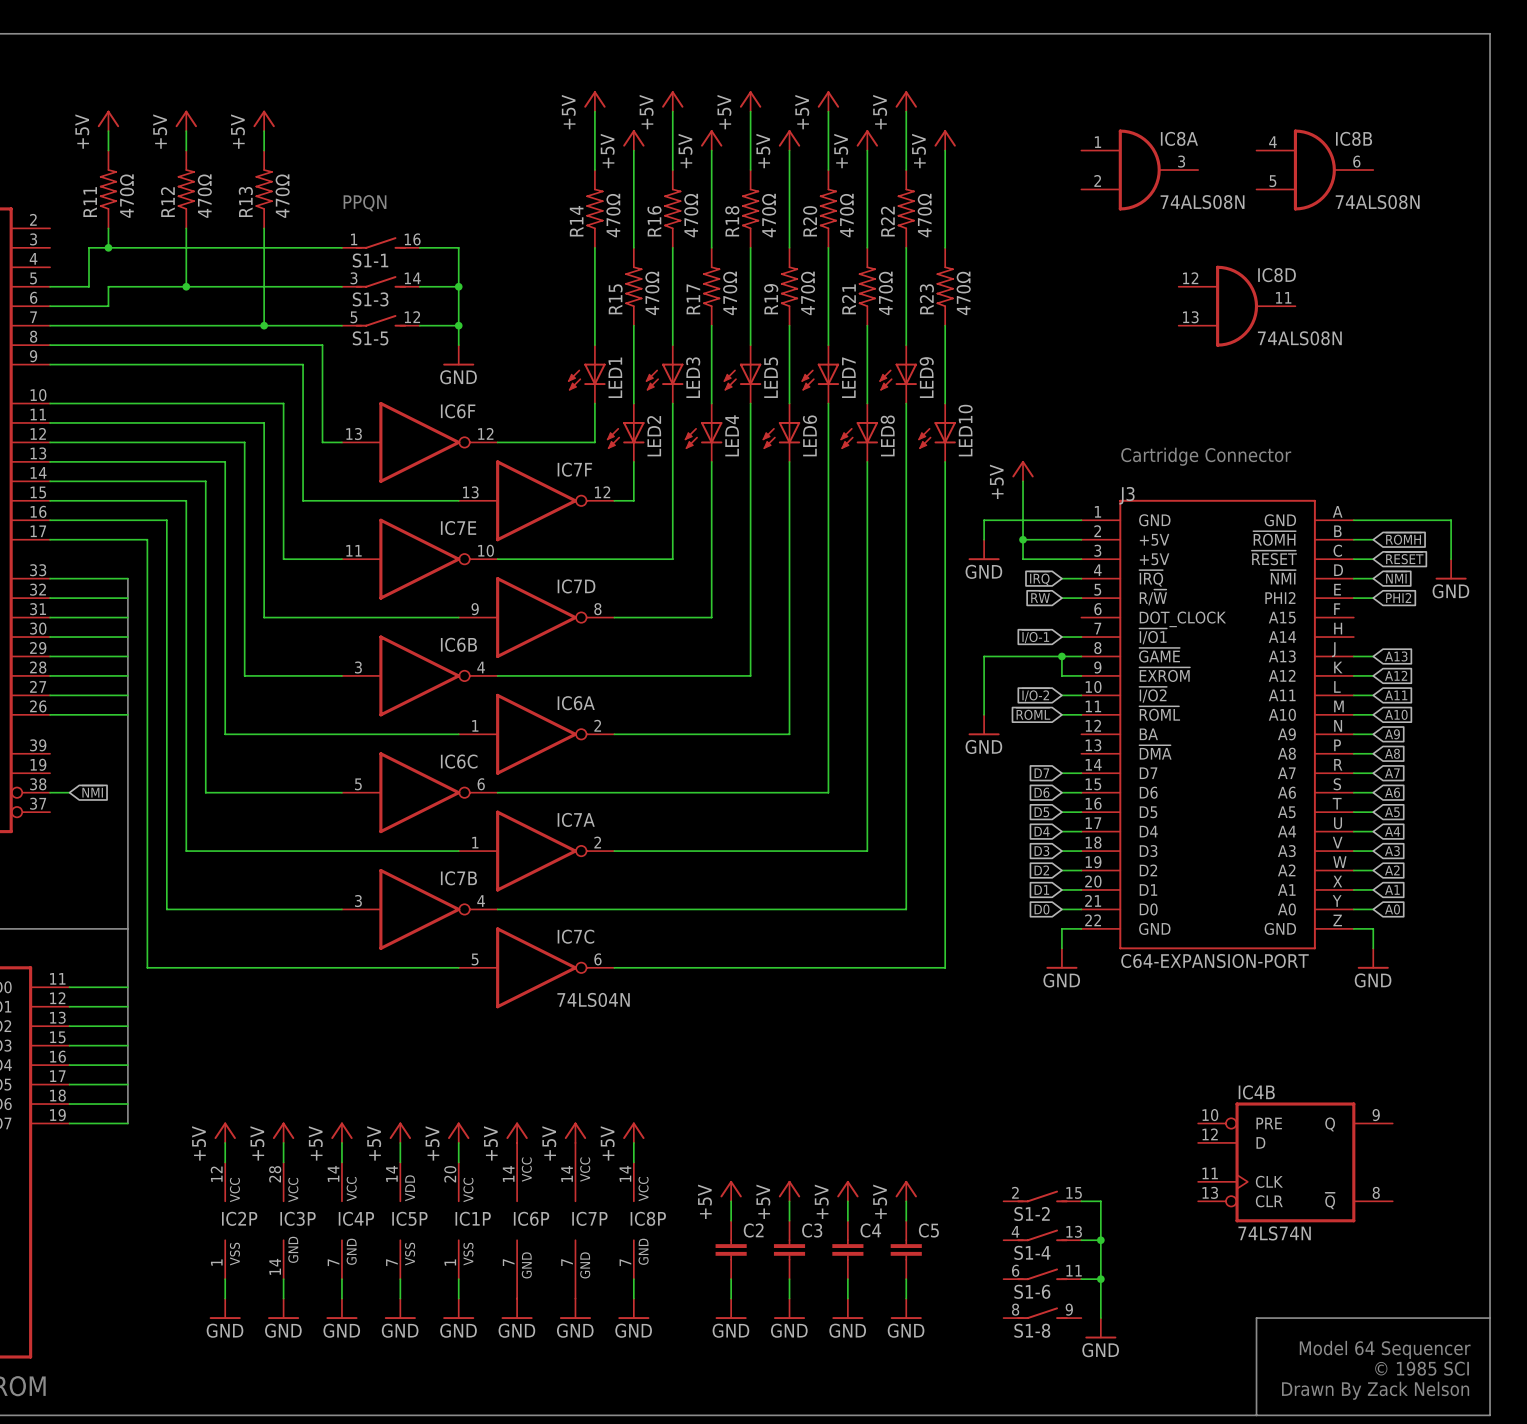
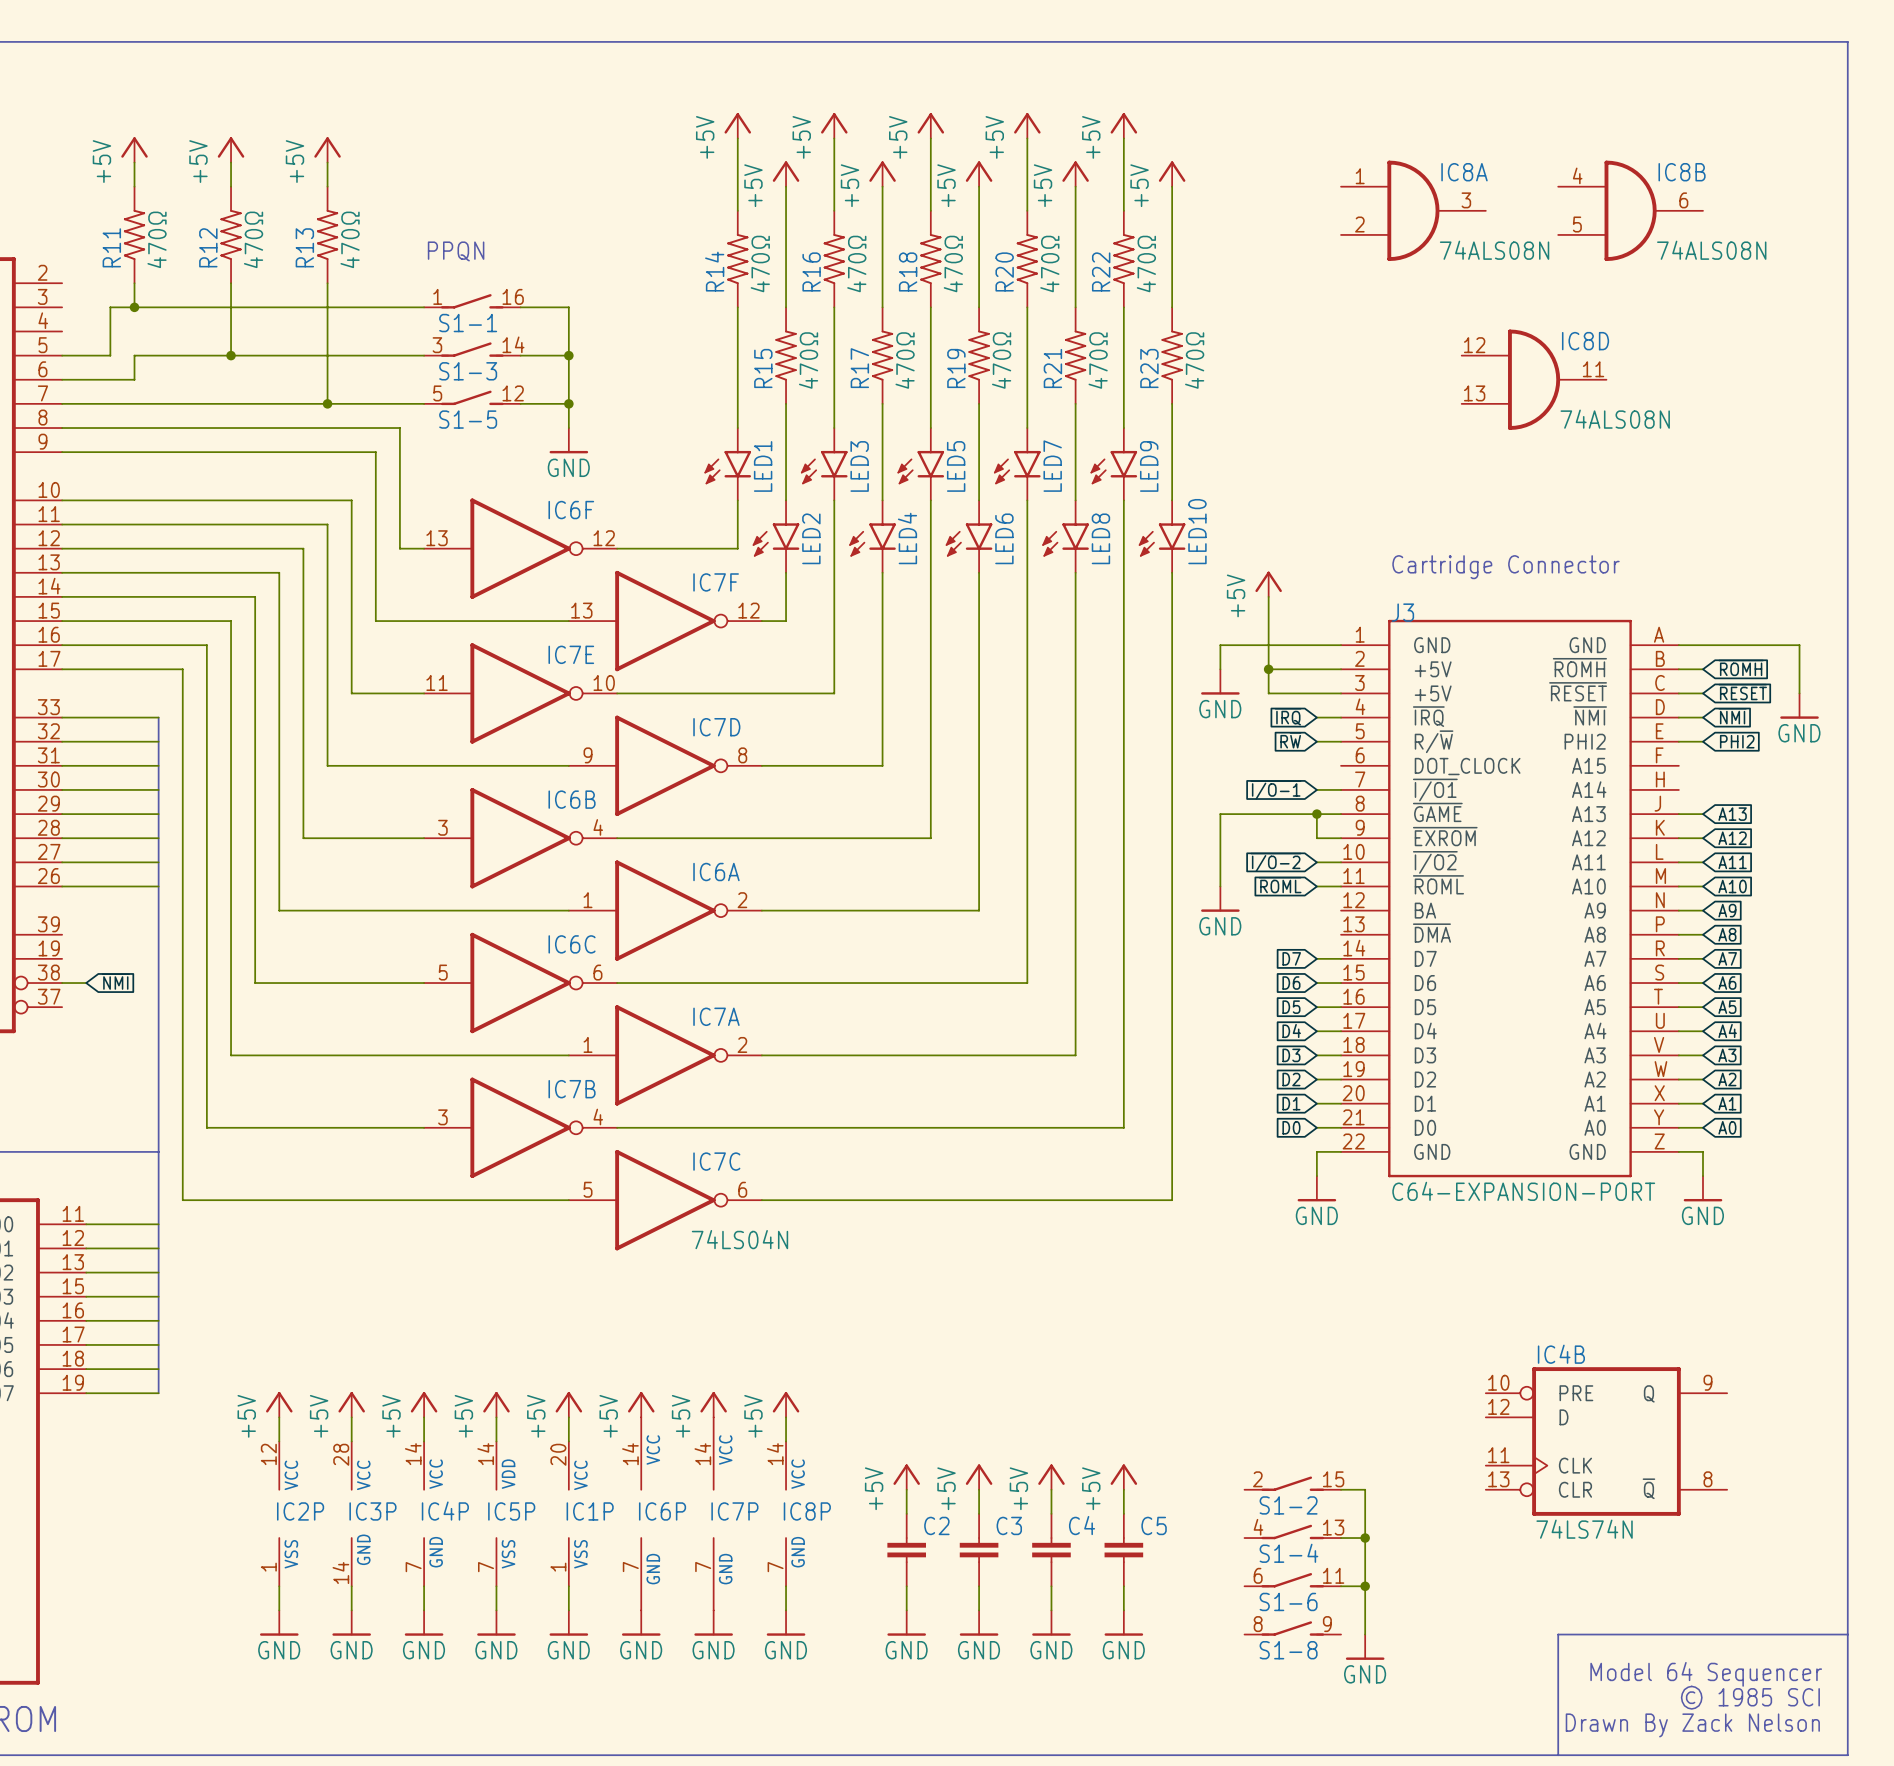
LED1 symbol: [568, 345, 606, 404] -> [704, 428, 752, 501]
LED3 symbol: [645, 345, 684, 404] -> [800, 428, 848, 501]
LED5 symbol: [723, 345, 762, 404] -> [897, 428, 945, 501]
LED7 symbol: [801, 345, 840, 404] -> [994, 428, 1041, 501]
LED9 symbol: [879, 345, 917, 404] -> [1090, 428, 1138, 501]
LED2 symbol: [606, 403, 645, 462] -> [752, 500, 800, 573]
LED4 symbol: [684, 403, 723, 462] -> [849, 500, 896, 573]
LED6 symbol: [762, 403, 801, 462] -> [945, 500, 993, 573]
LED8 symbol: [840, 403, 879, 462] -> [1042, 500, 1089, 573]
LED10 symbol: [918, 403, 956, 462] -> [1138, 500, 1186, 573]

